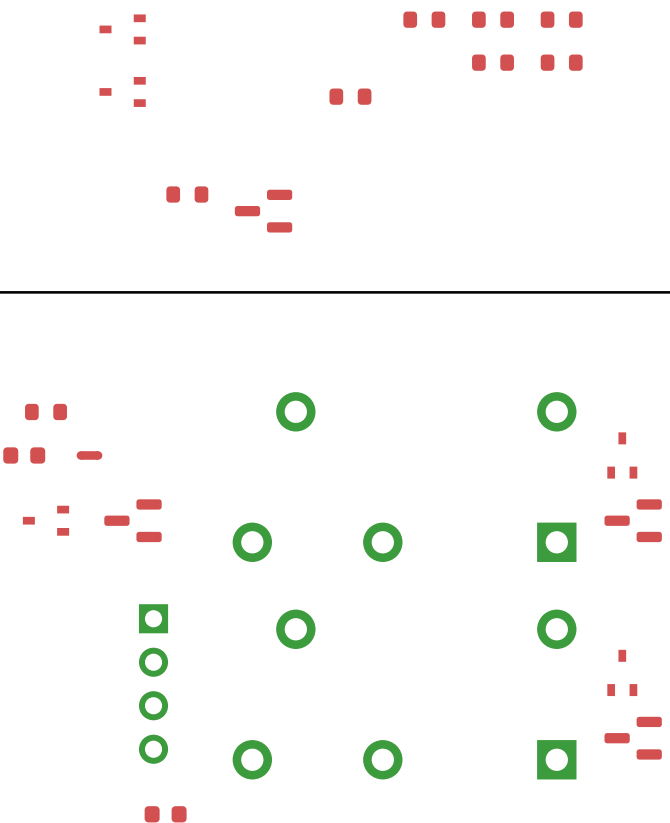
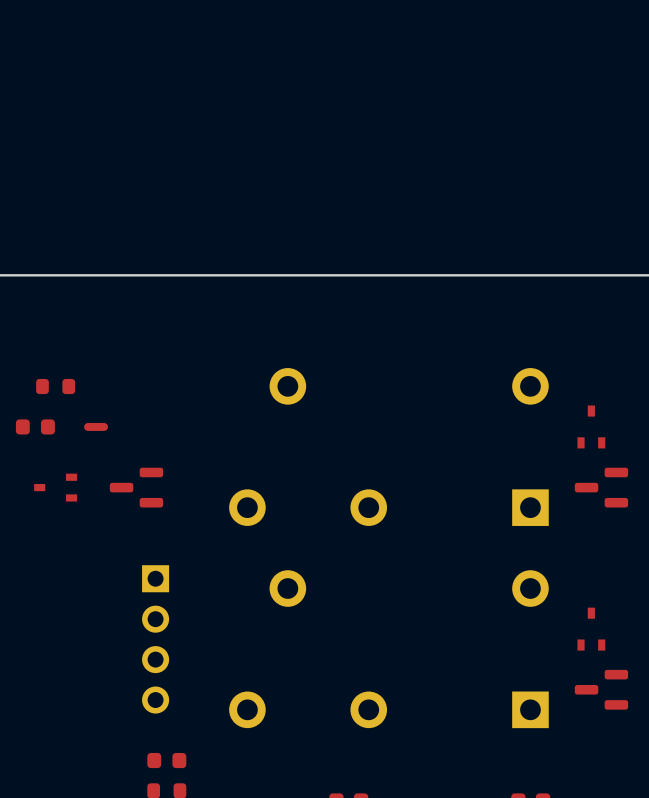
part: (424, 19) -> none
part: (493, 19) -> none
part: (561, 19) -> none
part: (122, 29) -> none
part: (493, 62) -> none
part: (561, 62) -> none
part: (122, 91) -> none
part: (350, 96) -> none
part: (187, 194) -> none
part: (263, 211) -> none

